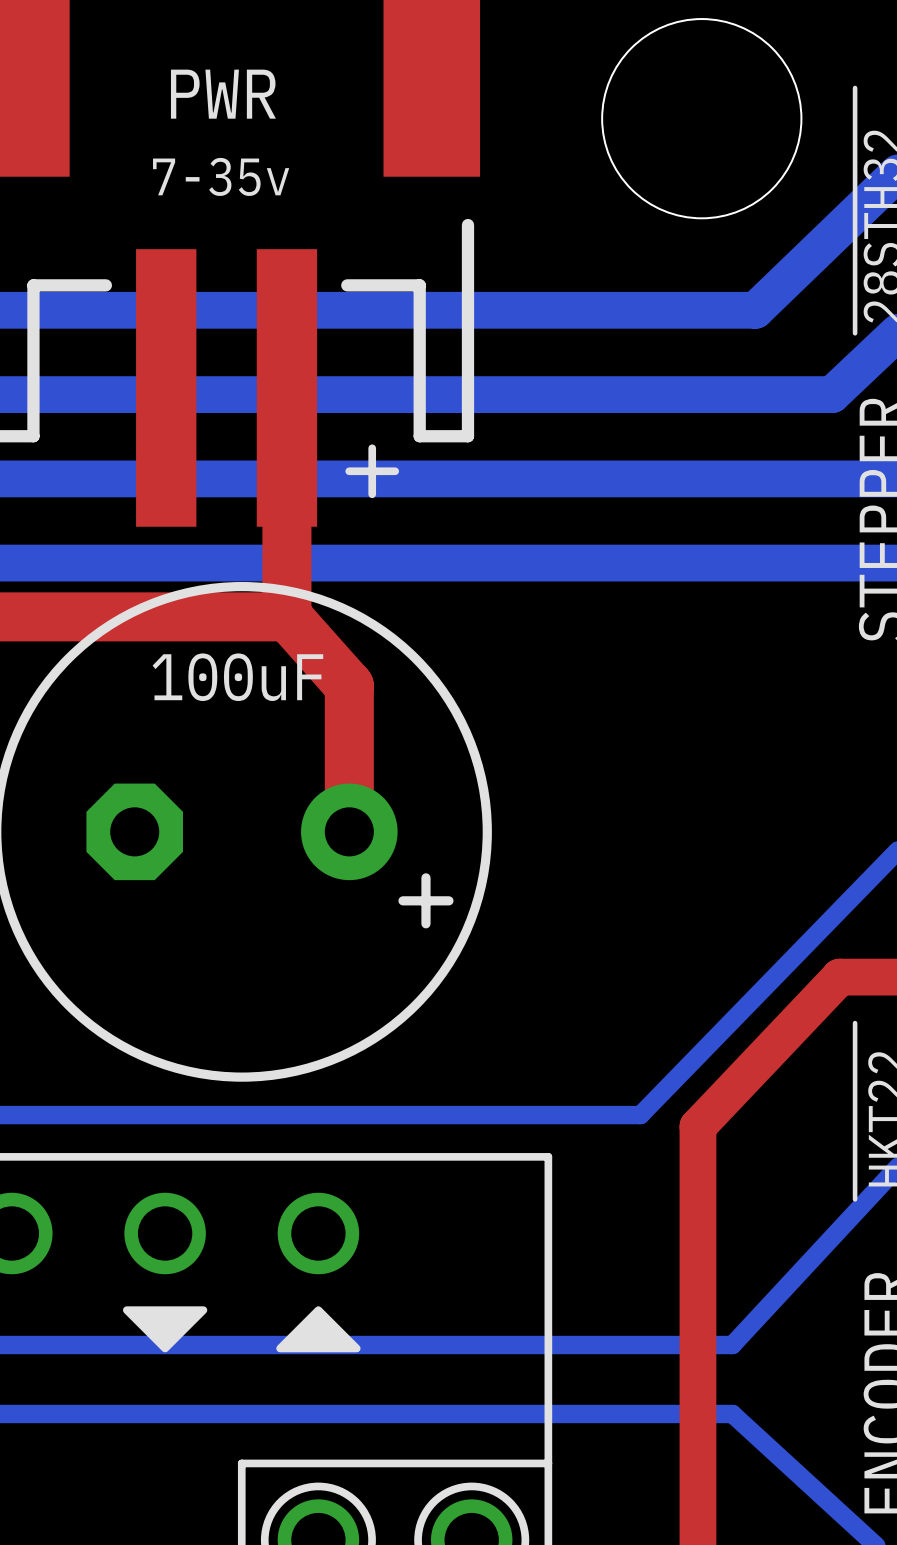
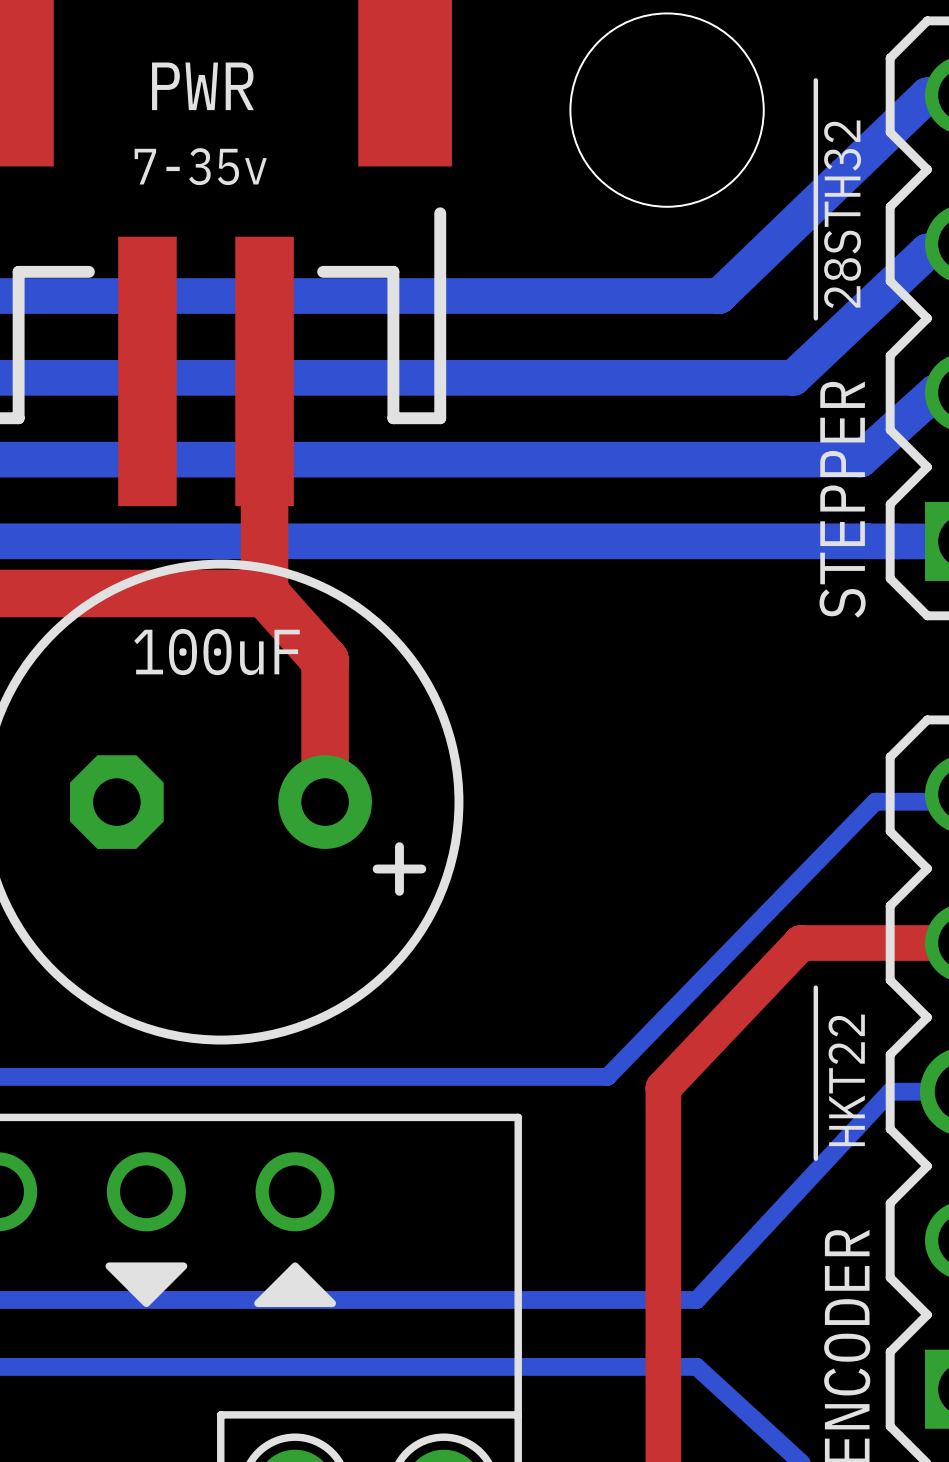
line: (372, 448) (372, 494) -> none
line: (349, 471) (395, 471) -> none

